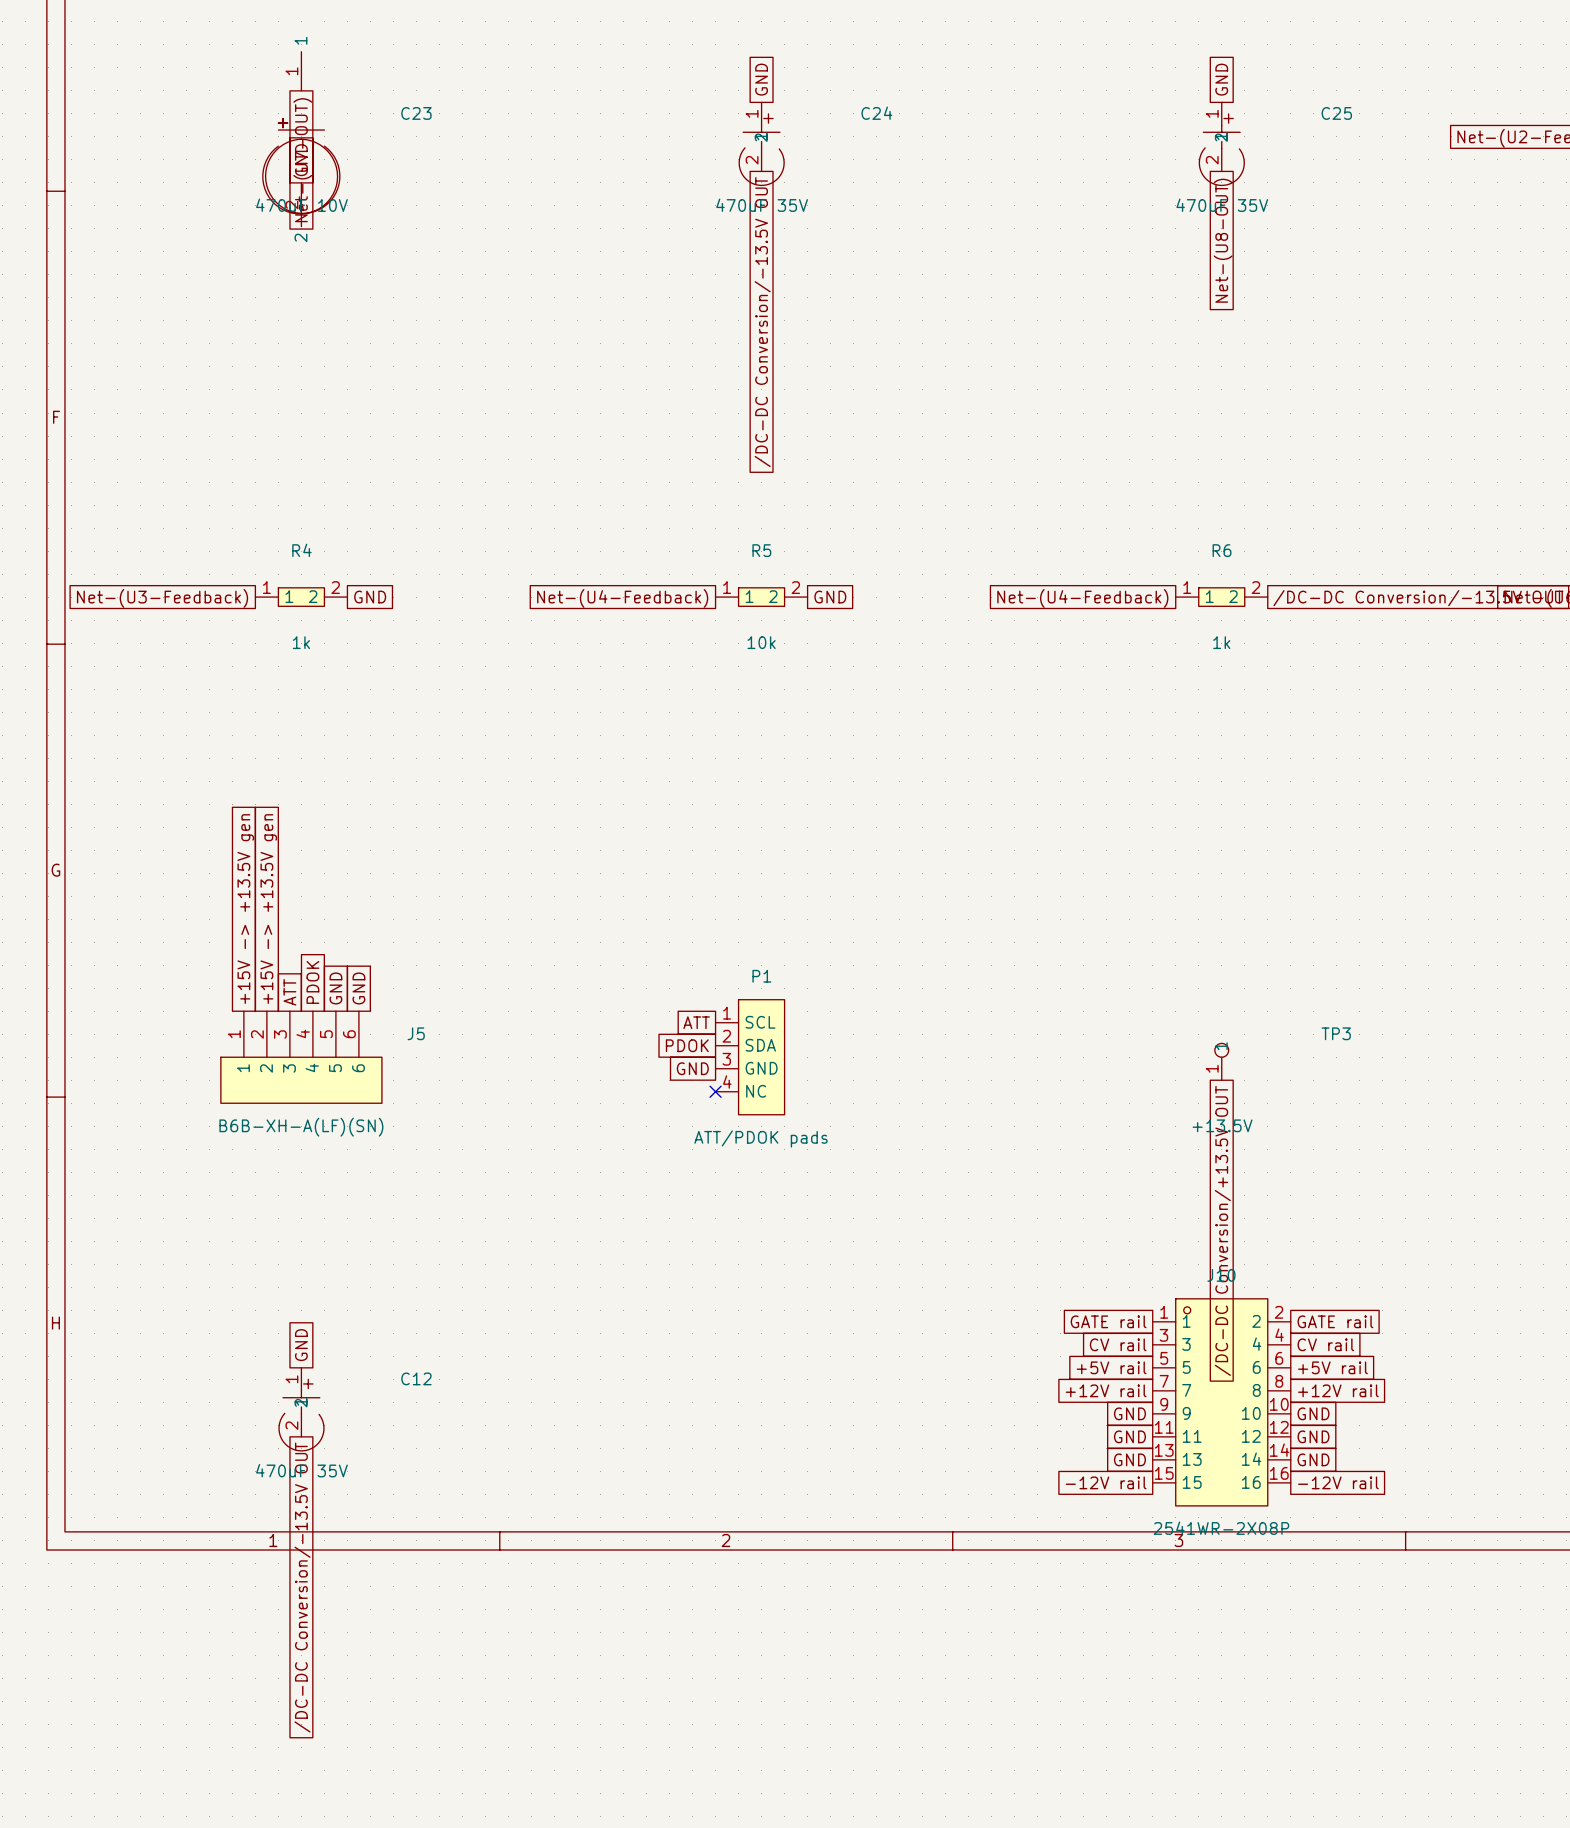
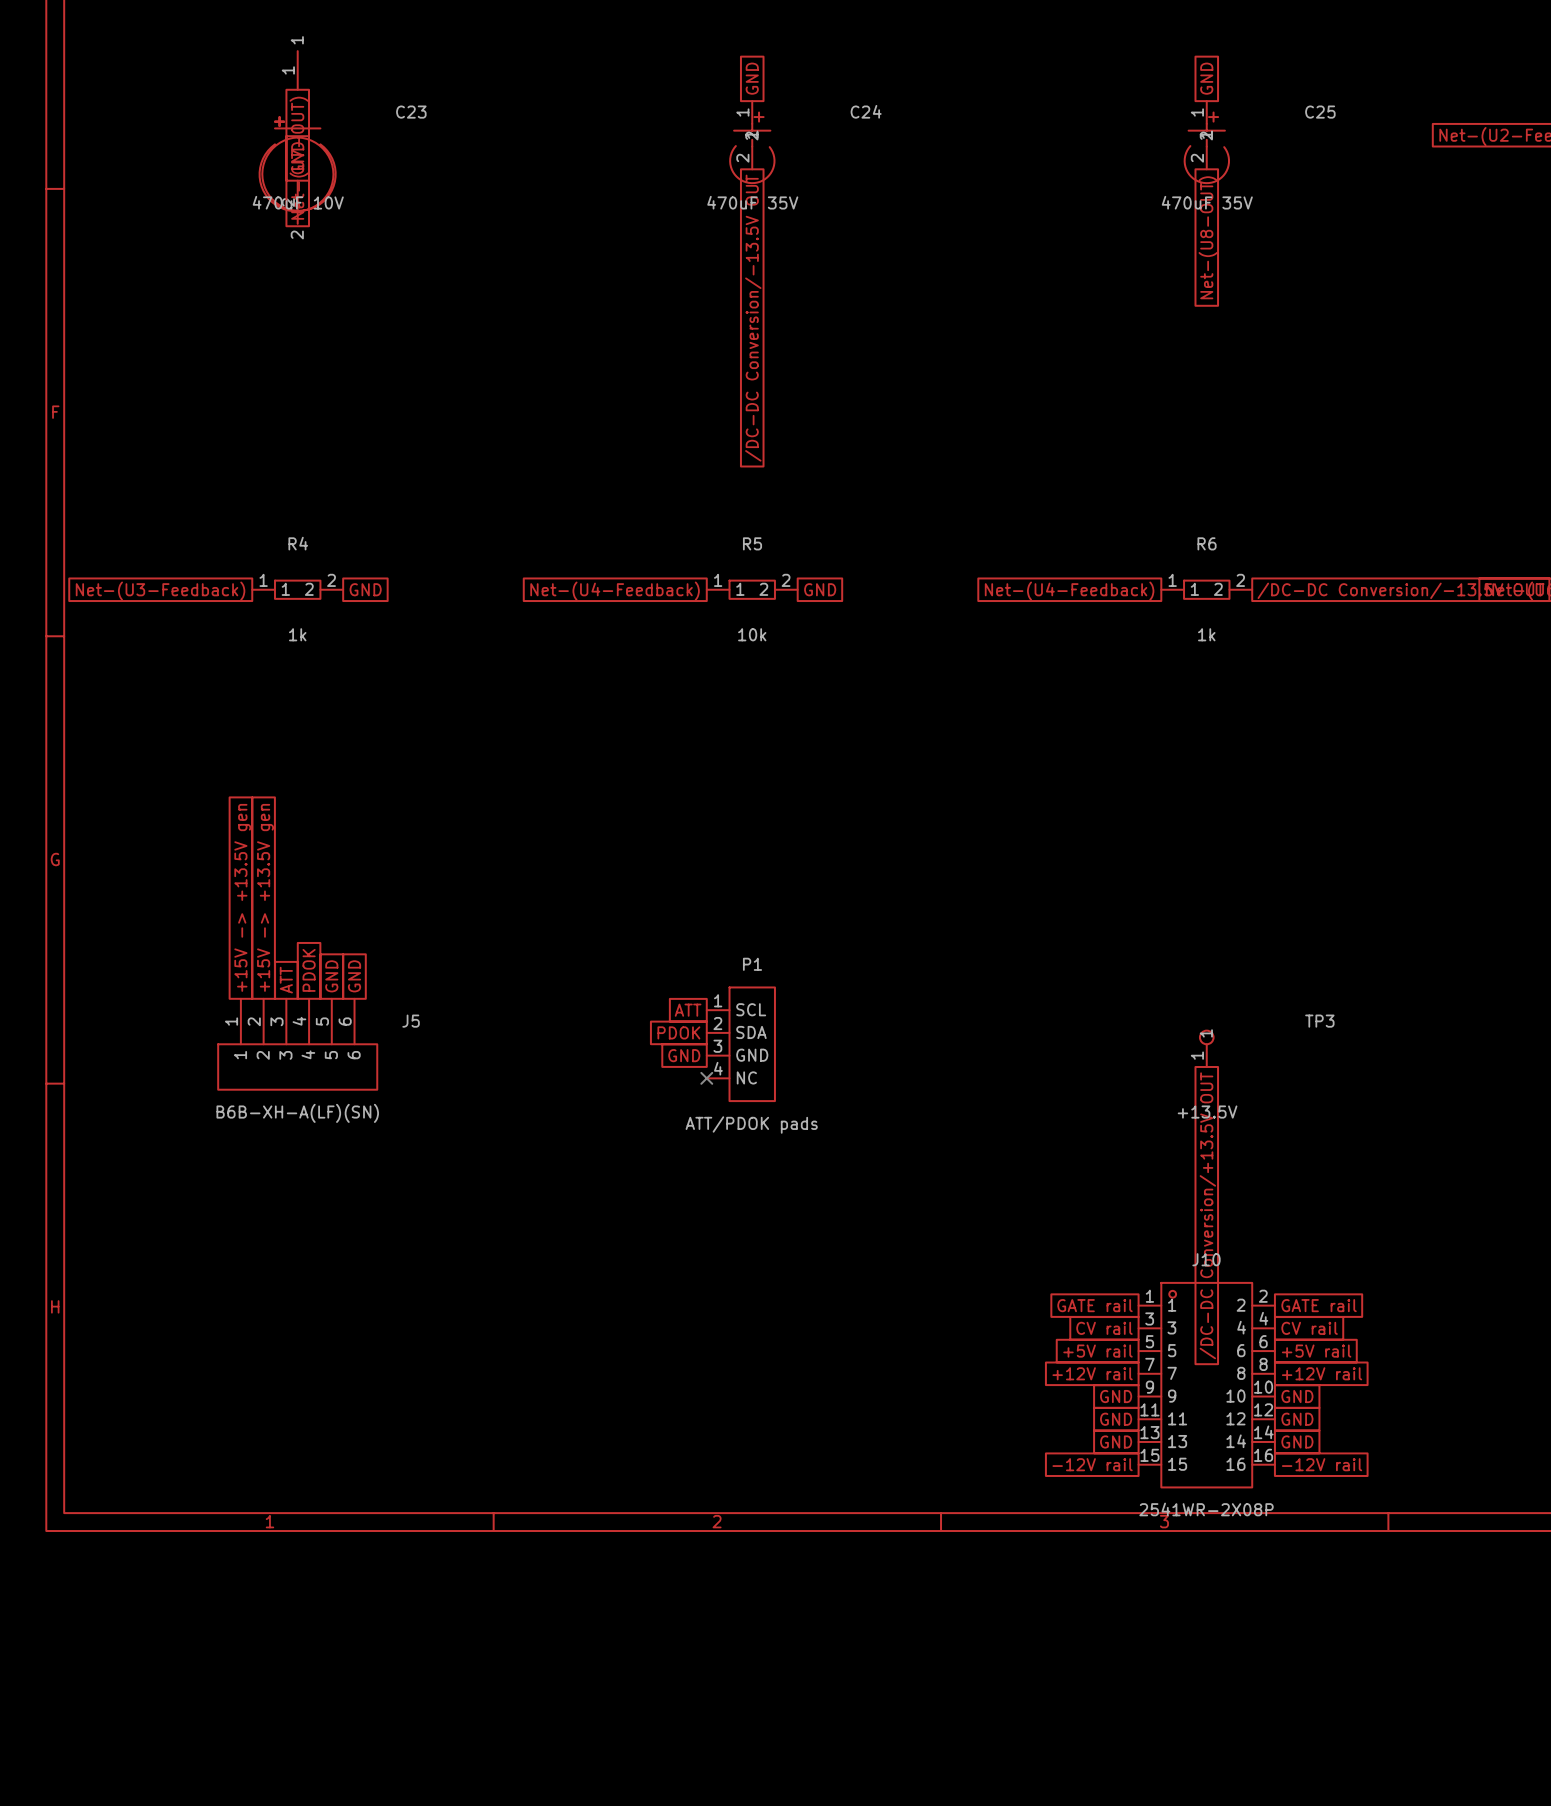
global label: GND (301, 1345) -> none
C12: 470uF 35V (301, 1409) -> none
global label: /DC-DC Conversion/-13.5V OUT (302, 1587) -> none

